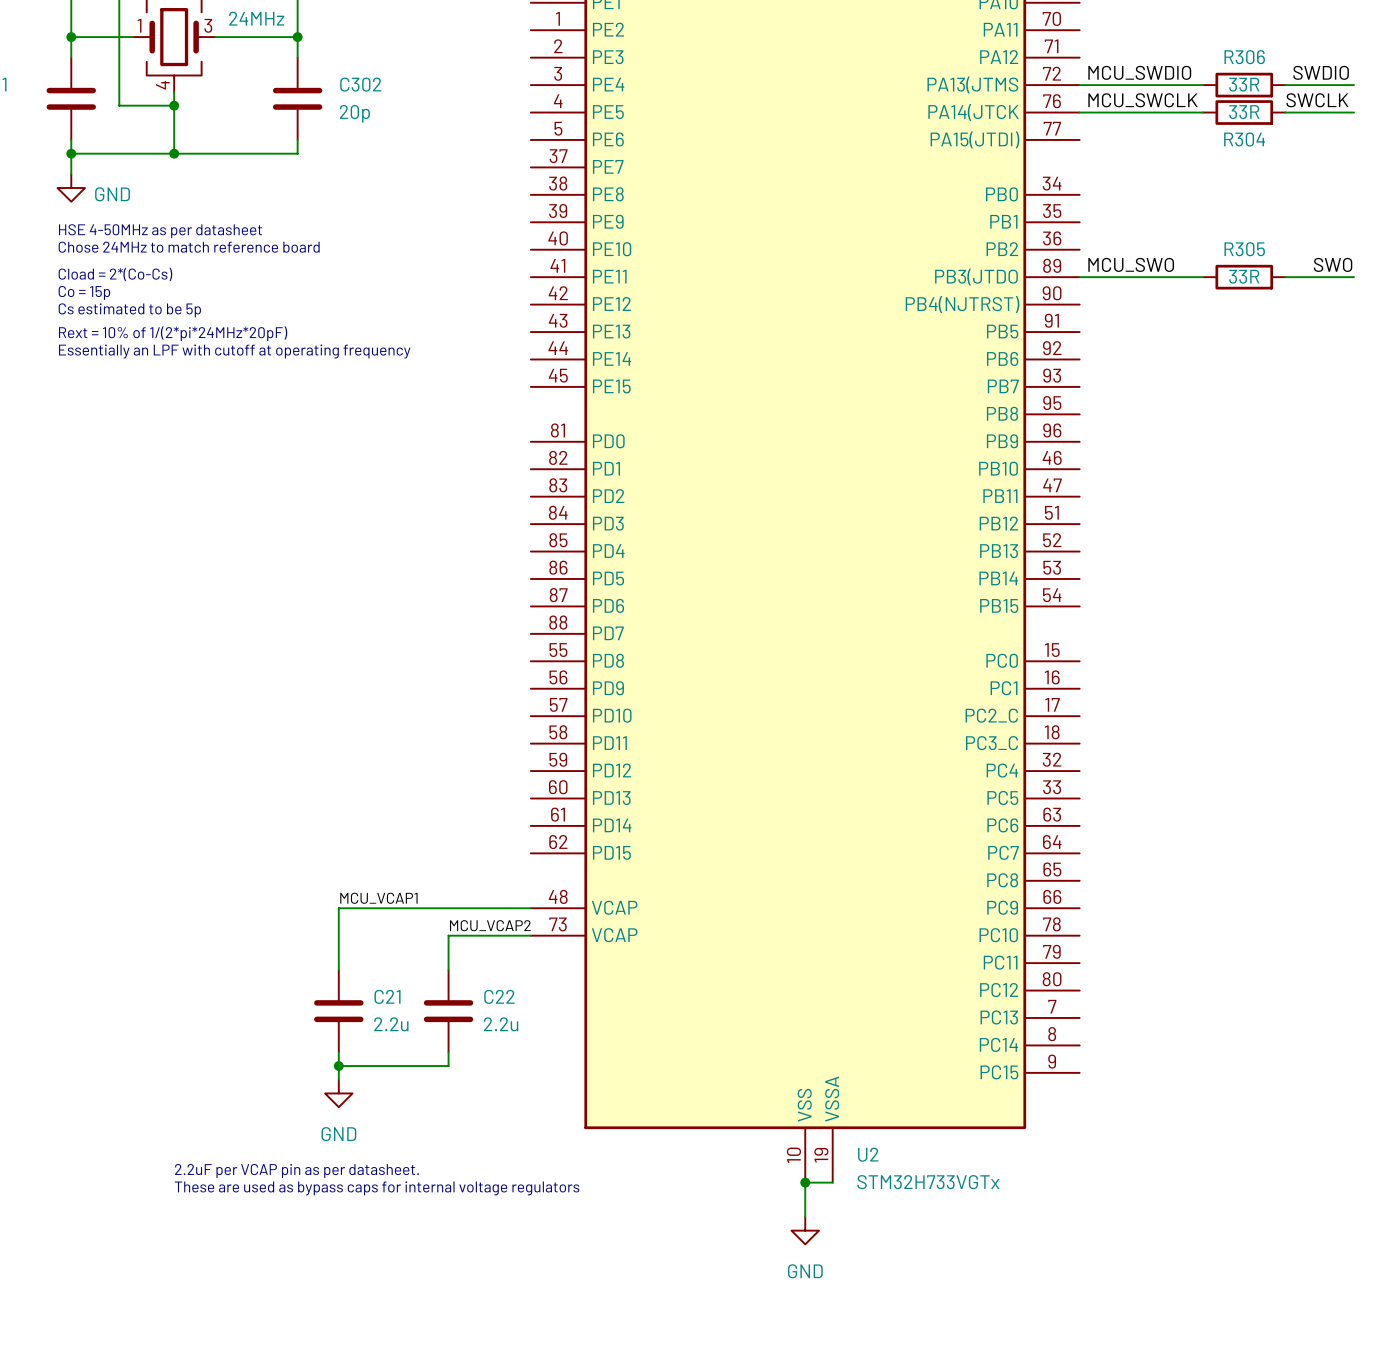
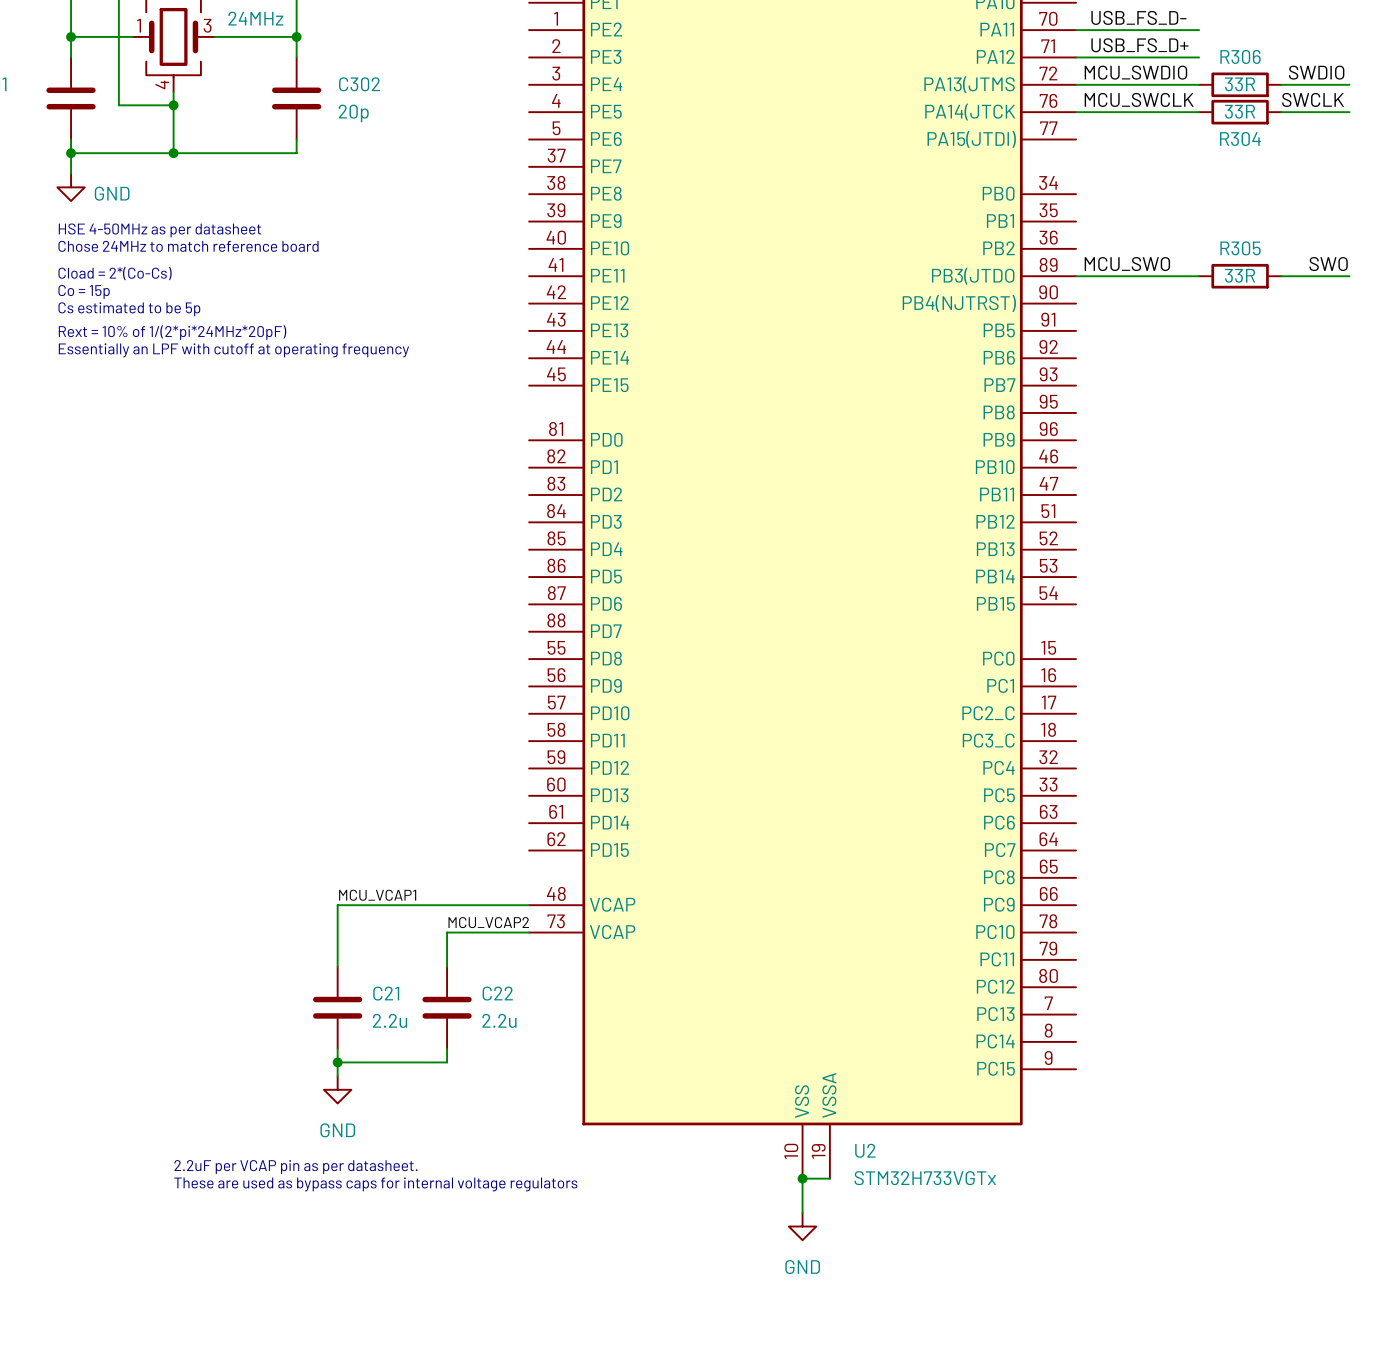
label: none -> USB_FS_D- (1138, 17)
wire: none -> (1076, 30) (1199, 30)
label: none -> USB_FS_D+ (1139, 45)
wire: none -> (1076, 57) (1199, 57)

